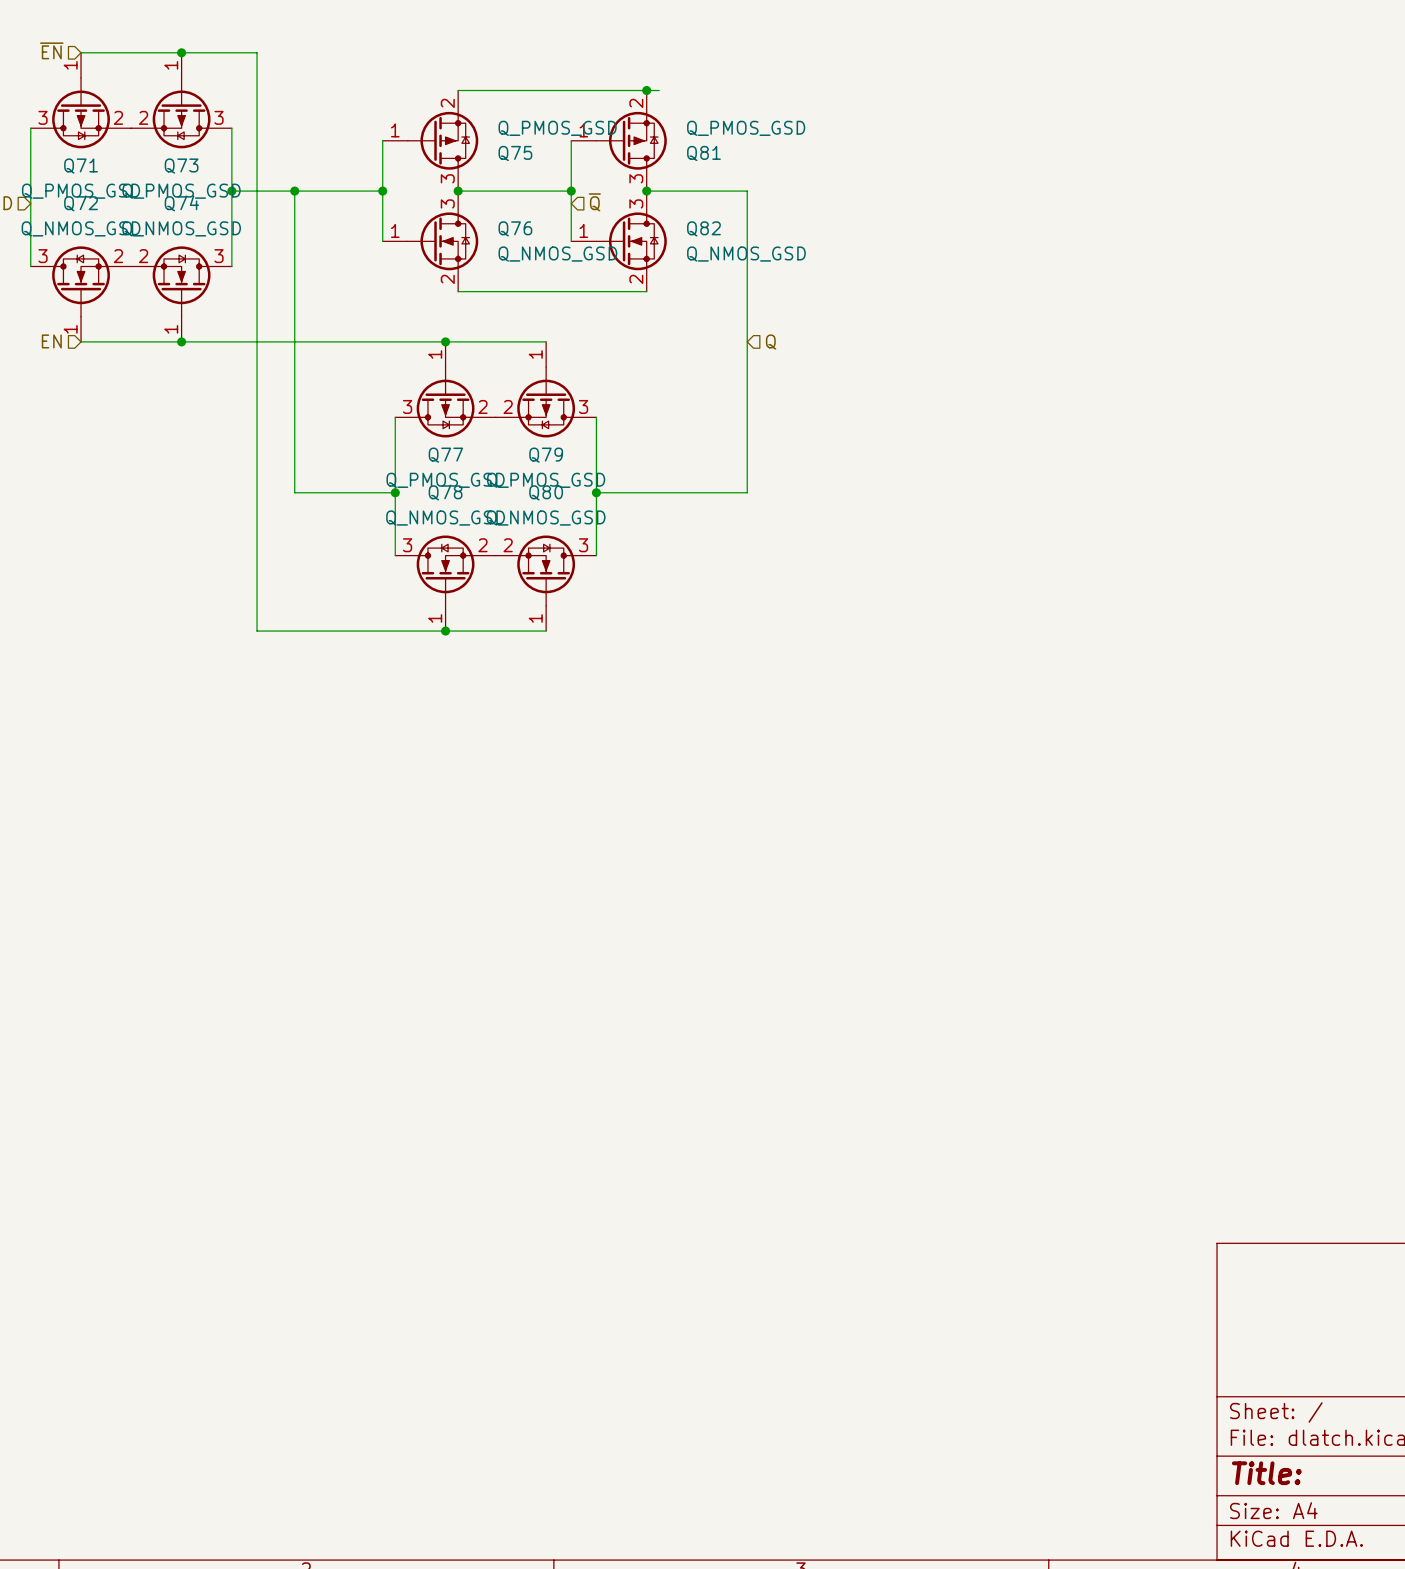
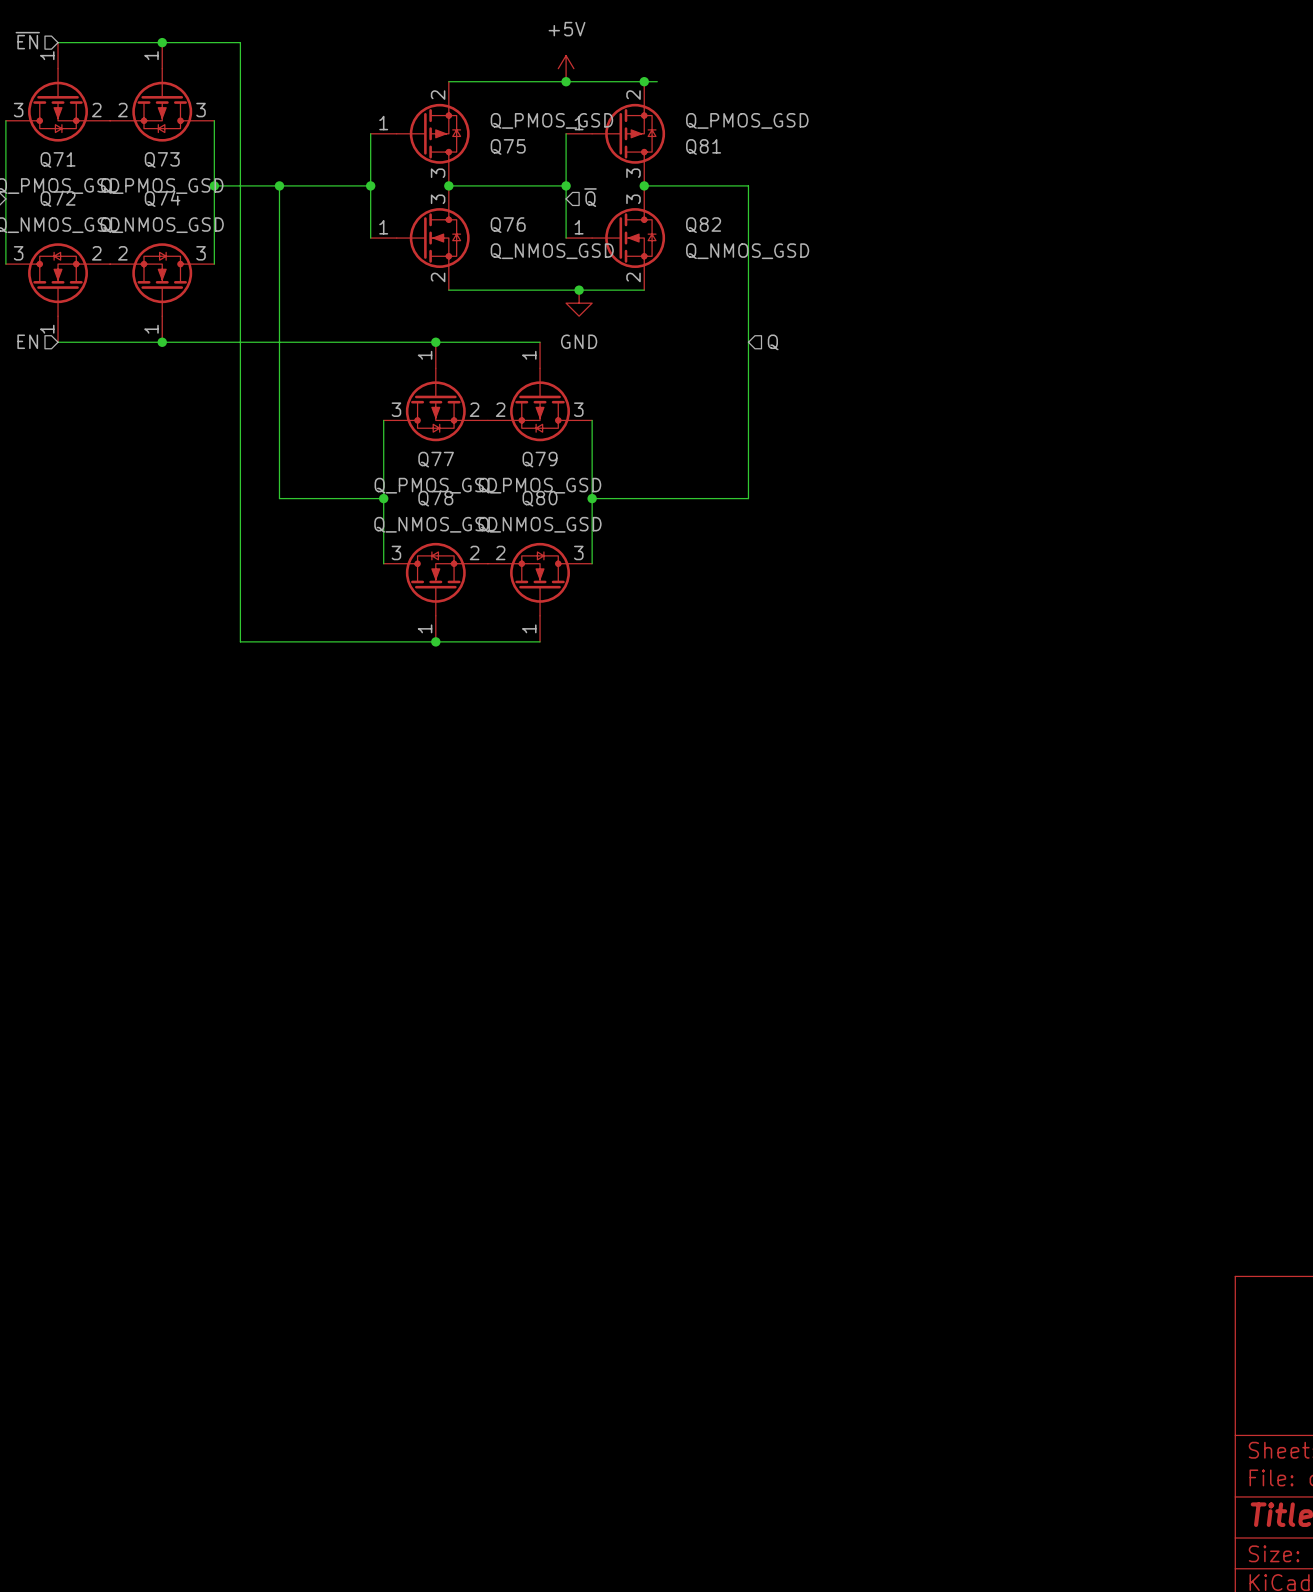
power symbol: none -> +5V (566, 68)
junction: none -> (566, 81)
junction: none -> (579, 290)
power symbol: none -> GND (579, 303)

